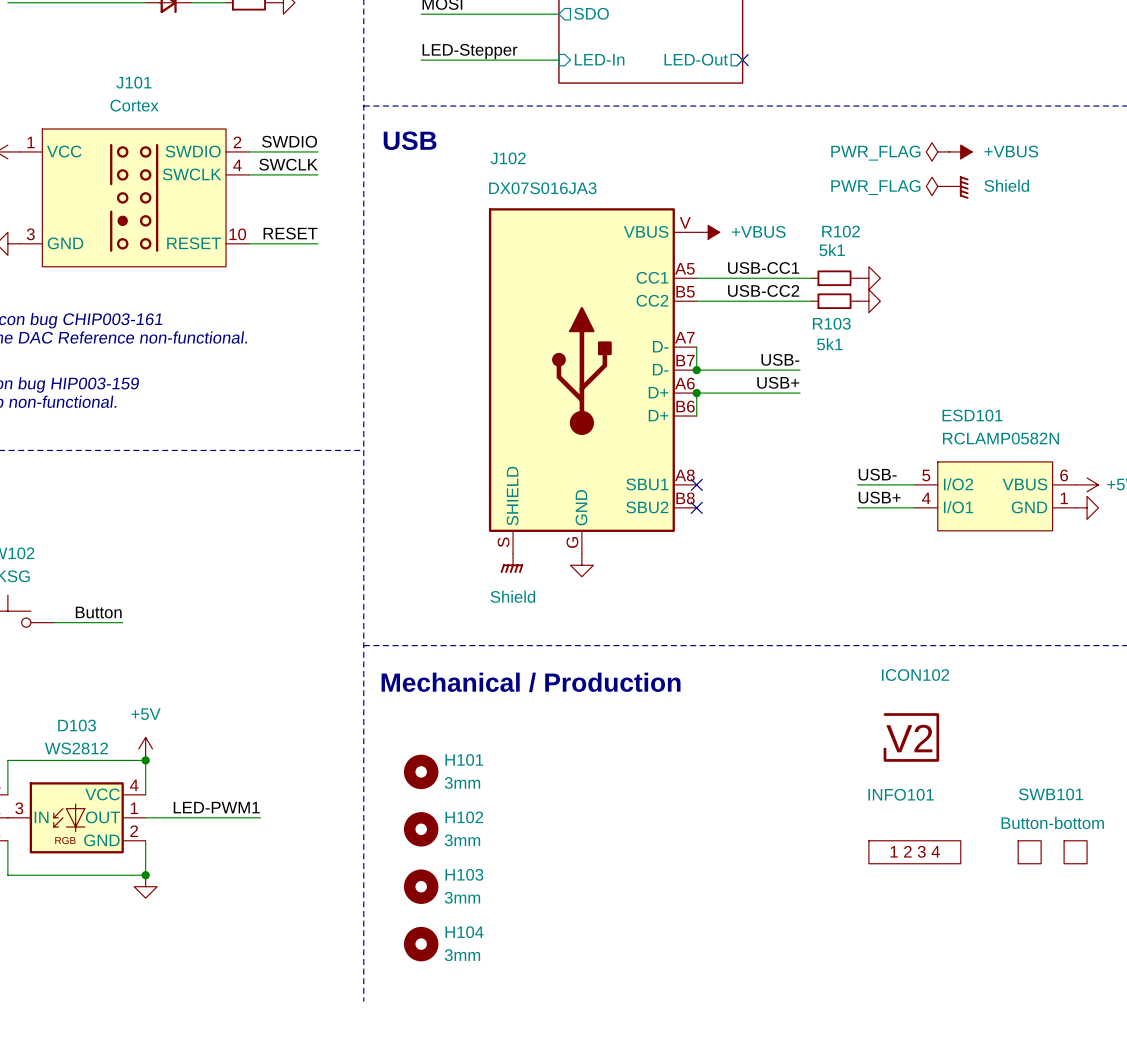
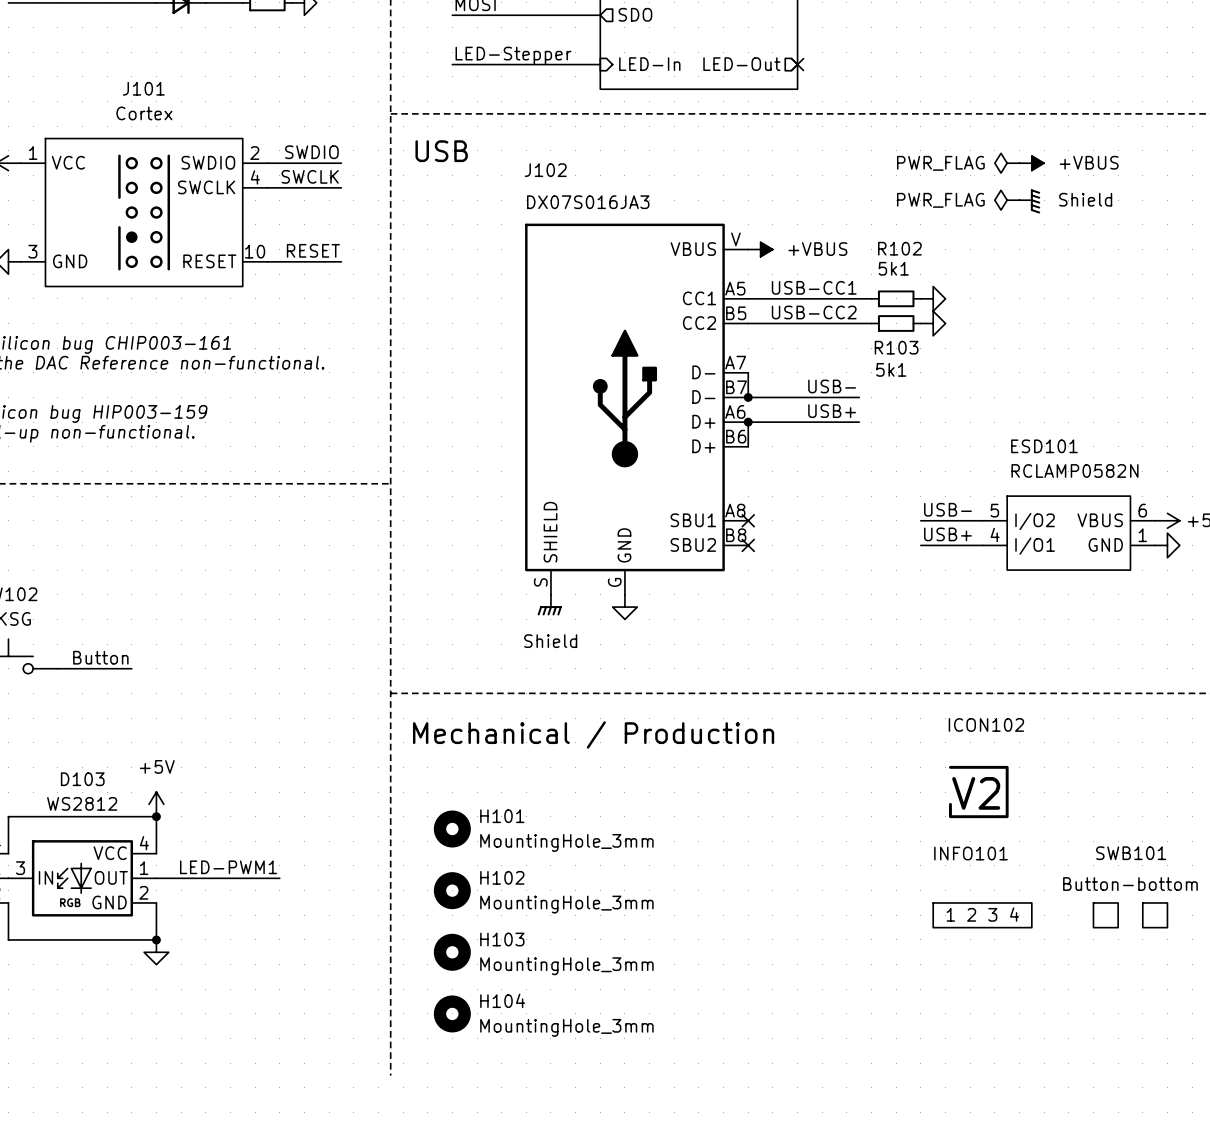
H101 value: 3mm (462, 782) -> MountingHole_3mm (566, 842)
H102 value: 3mm (462, 840) -> MountingHole_3mm (566, 904)
H103 value: 3mm (462, 897) -> MountingHole_3mm (566, 966)
H104 value: 3mm (462, 955) -> MountingHole_3mm (566, 1027)

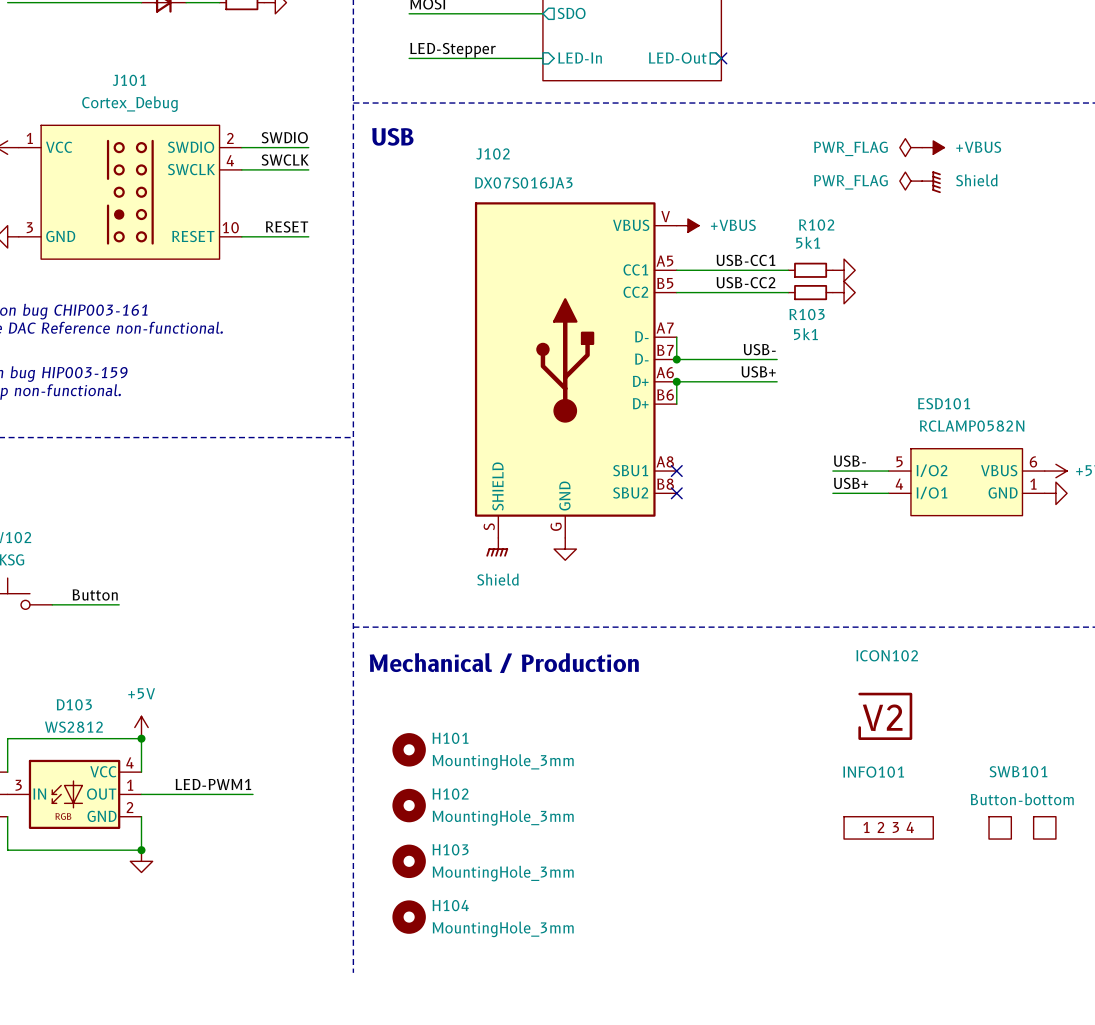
J101 value: Cortex (144, 113) -> Cortex_Debug (129, 104)

